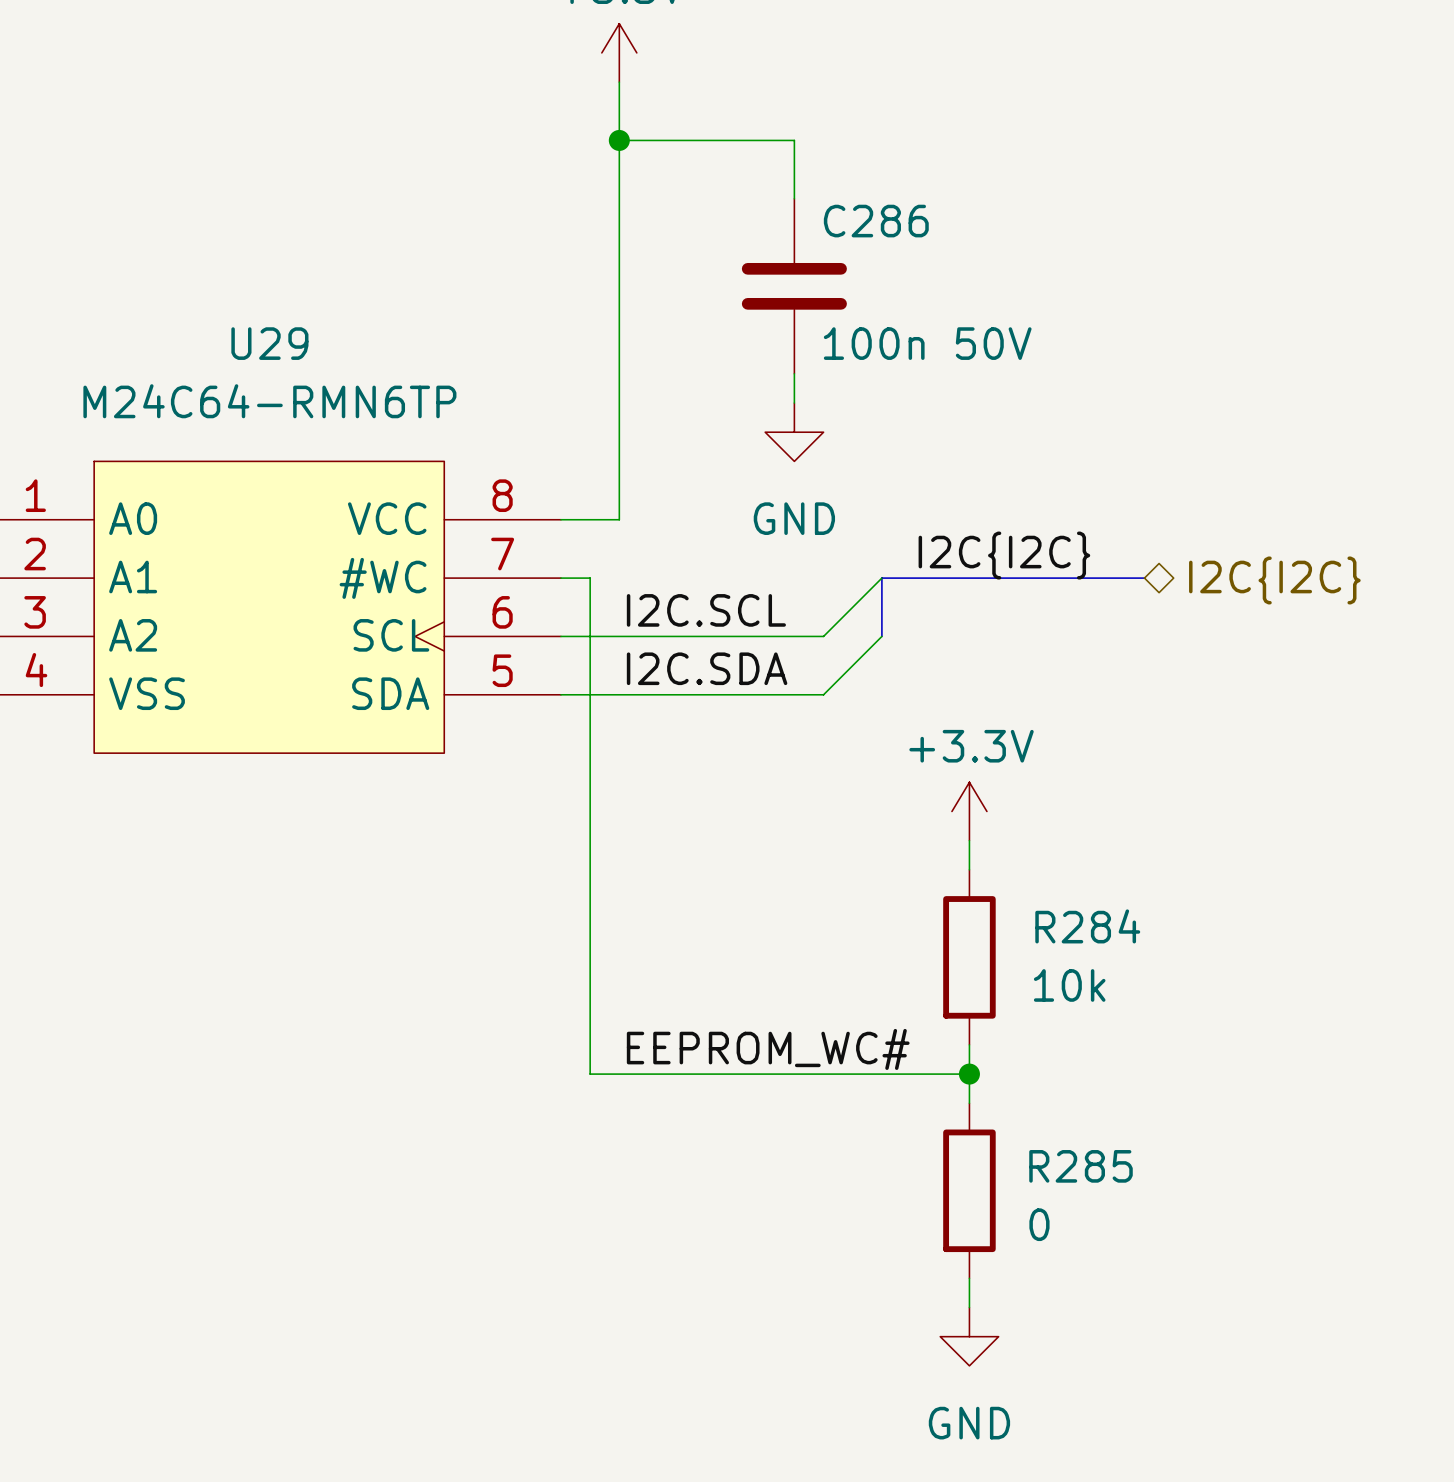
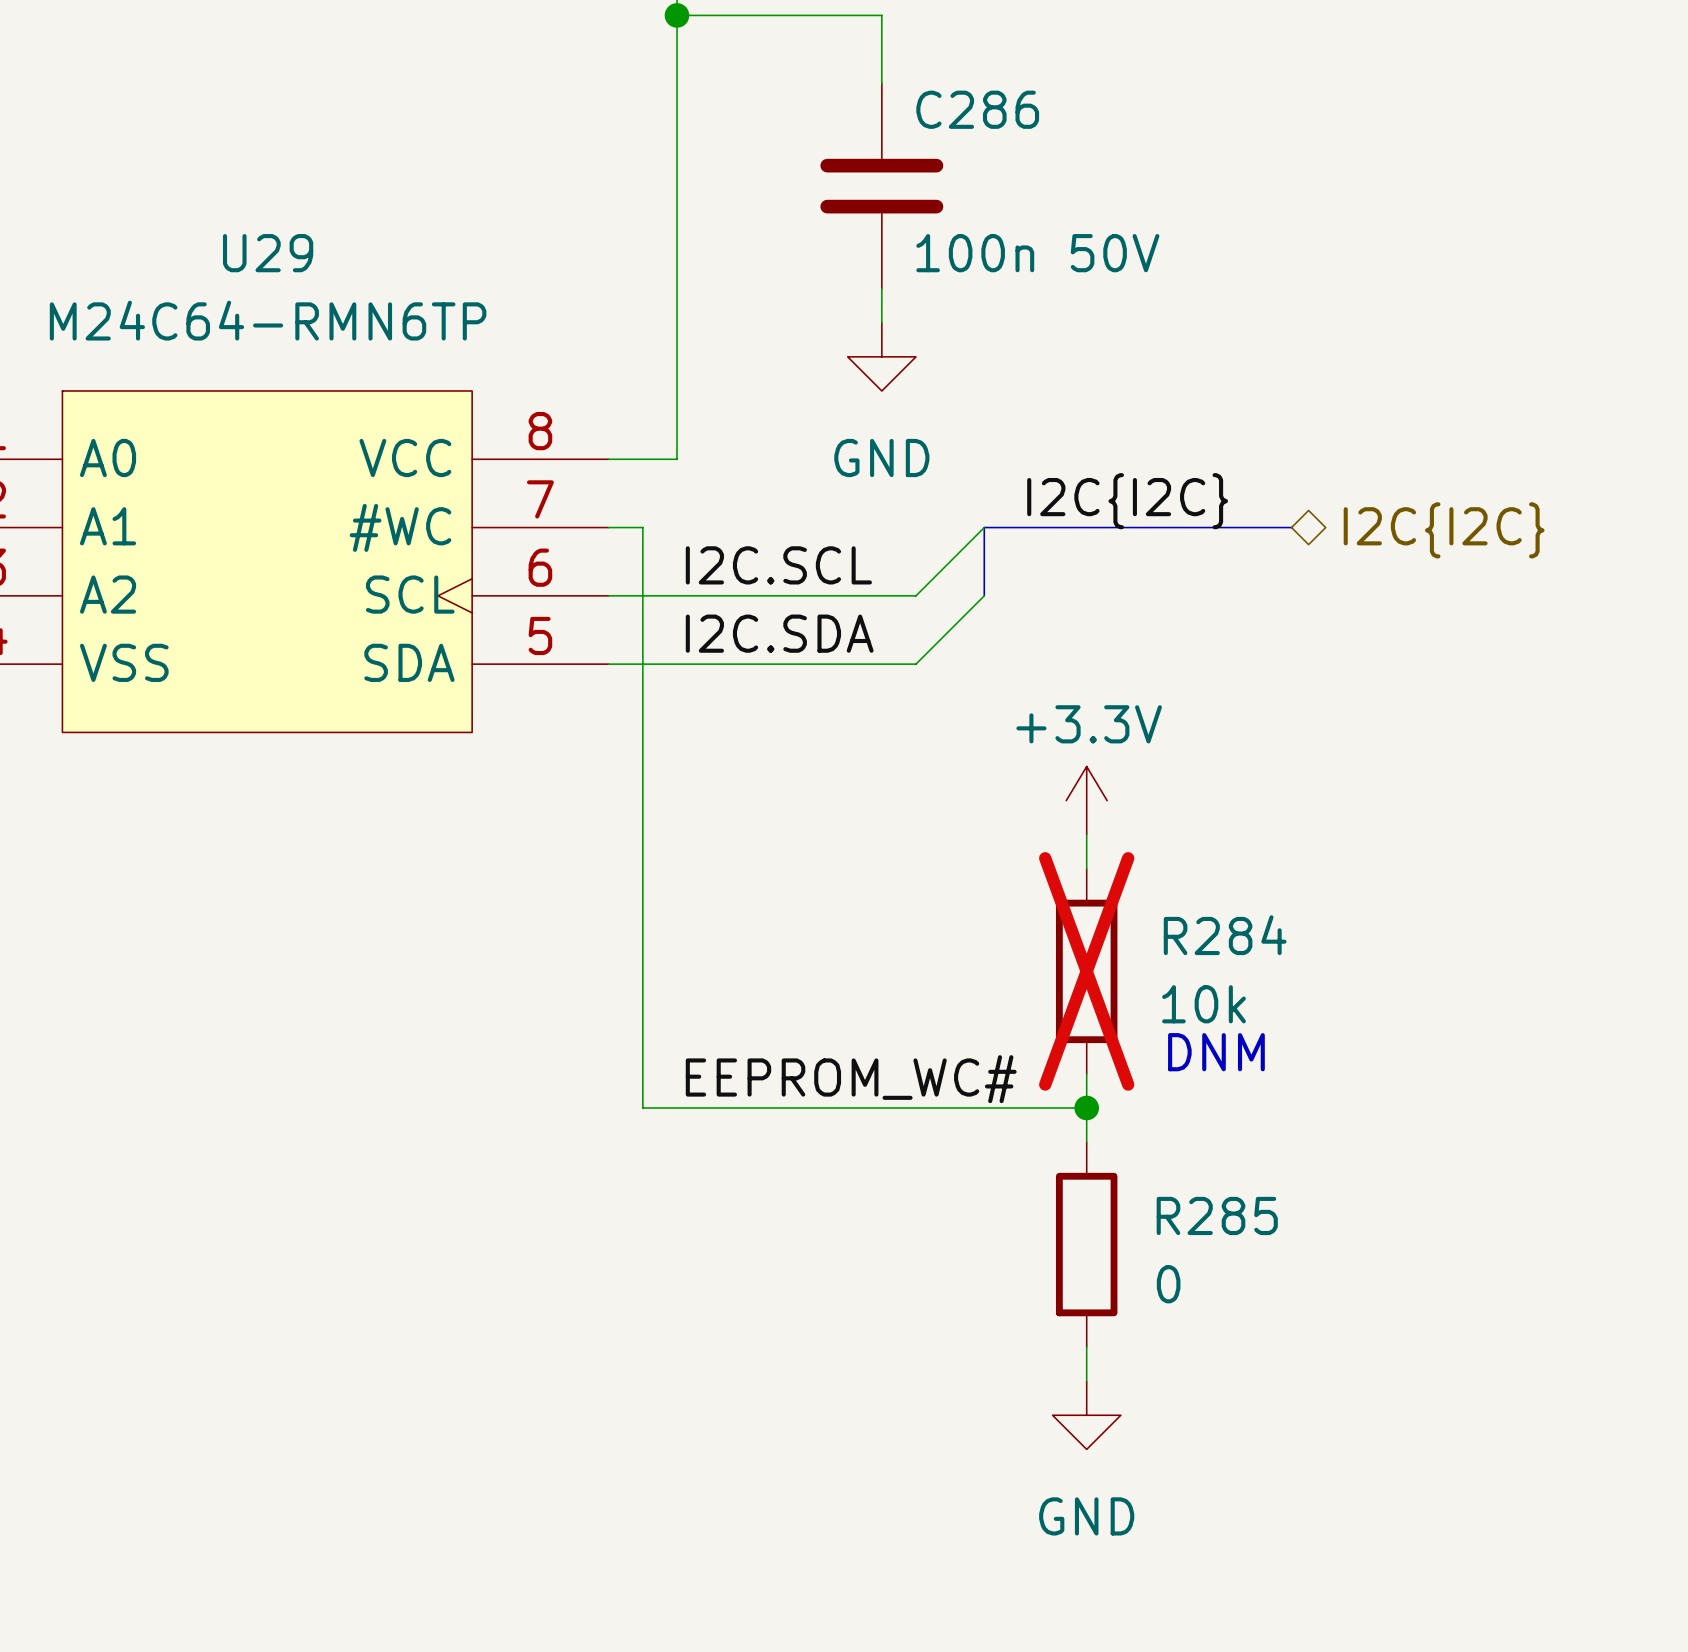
R284 do-not-place cross: none -> (1086, 971)
text: none -> DNM (1216, 1052)

